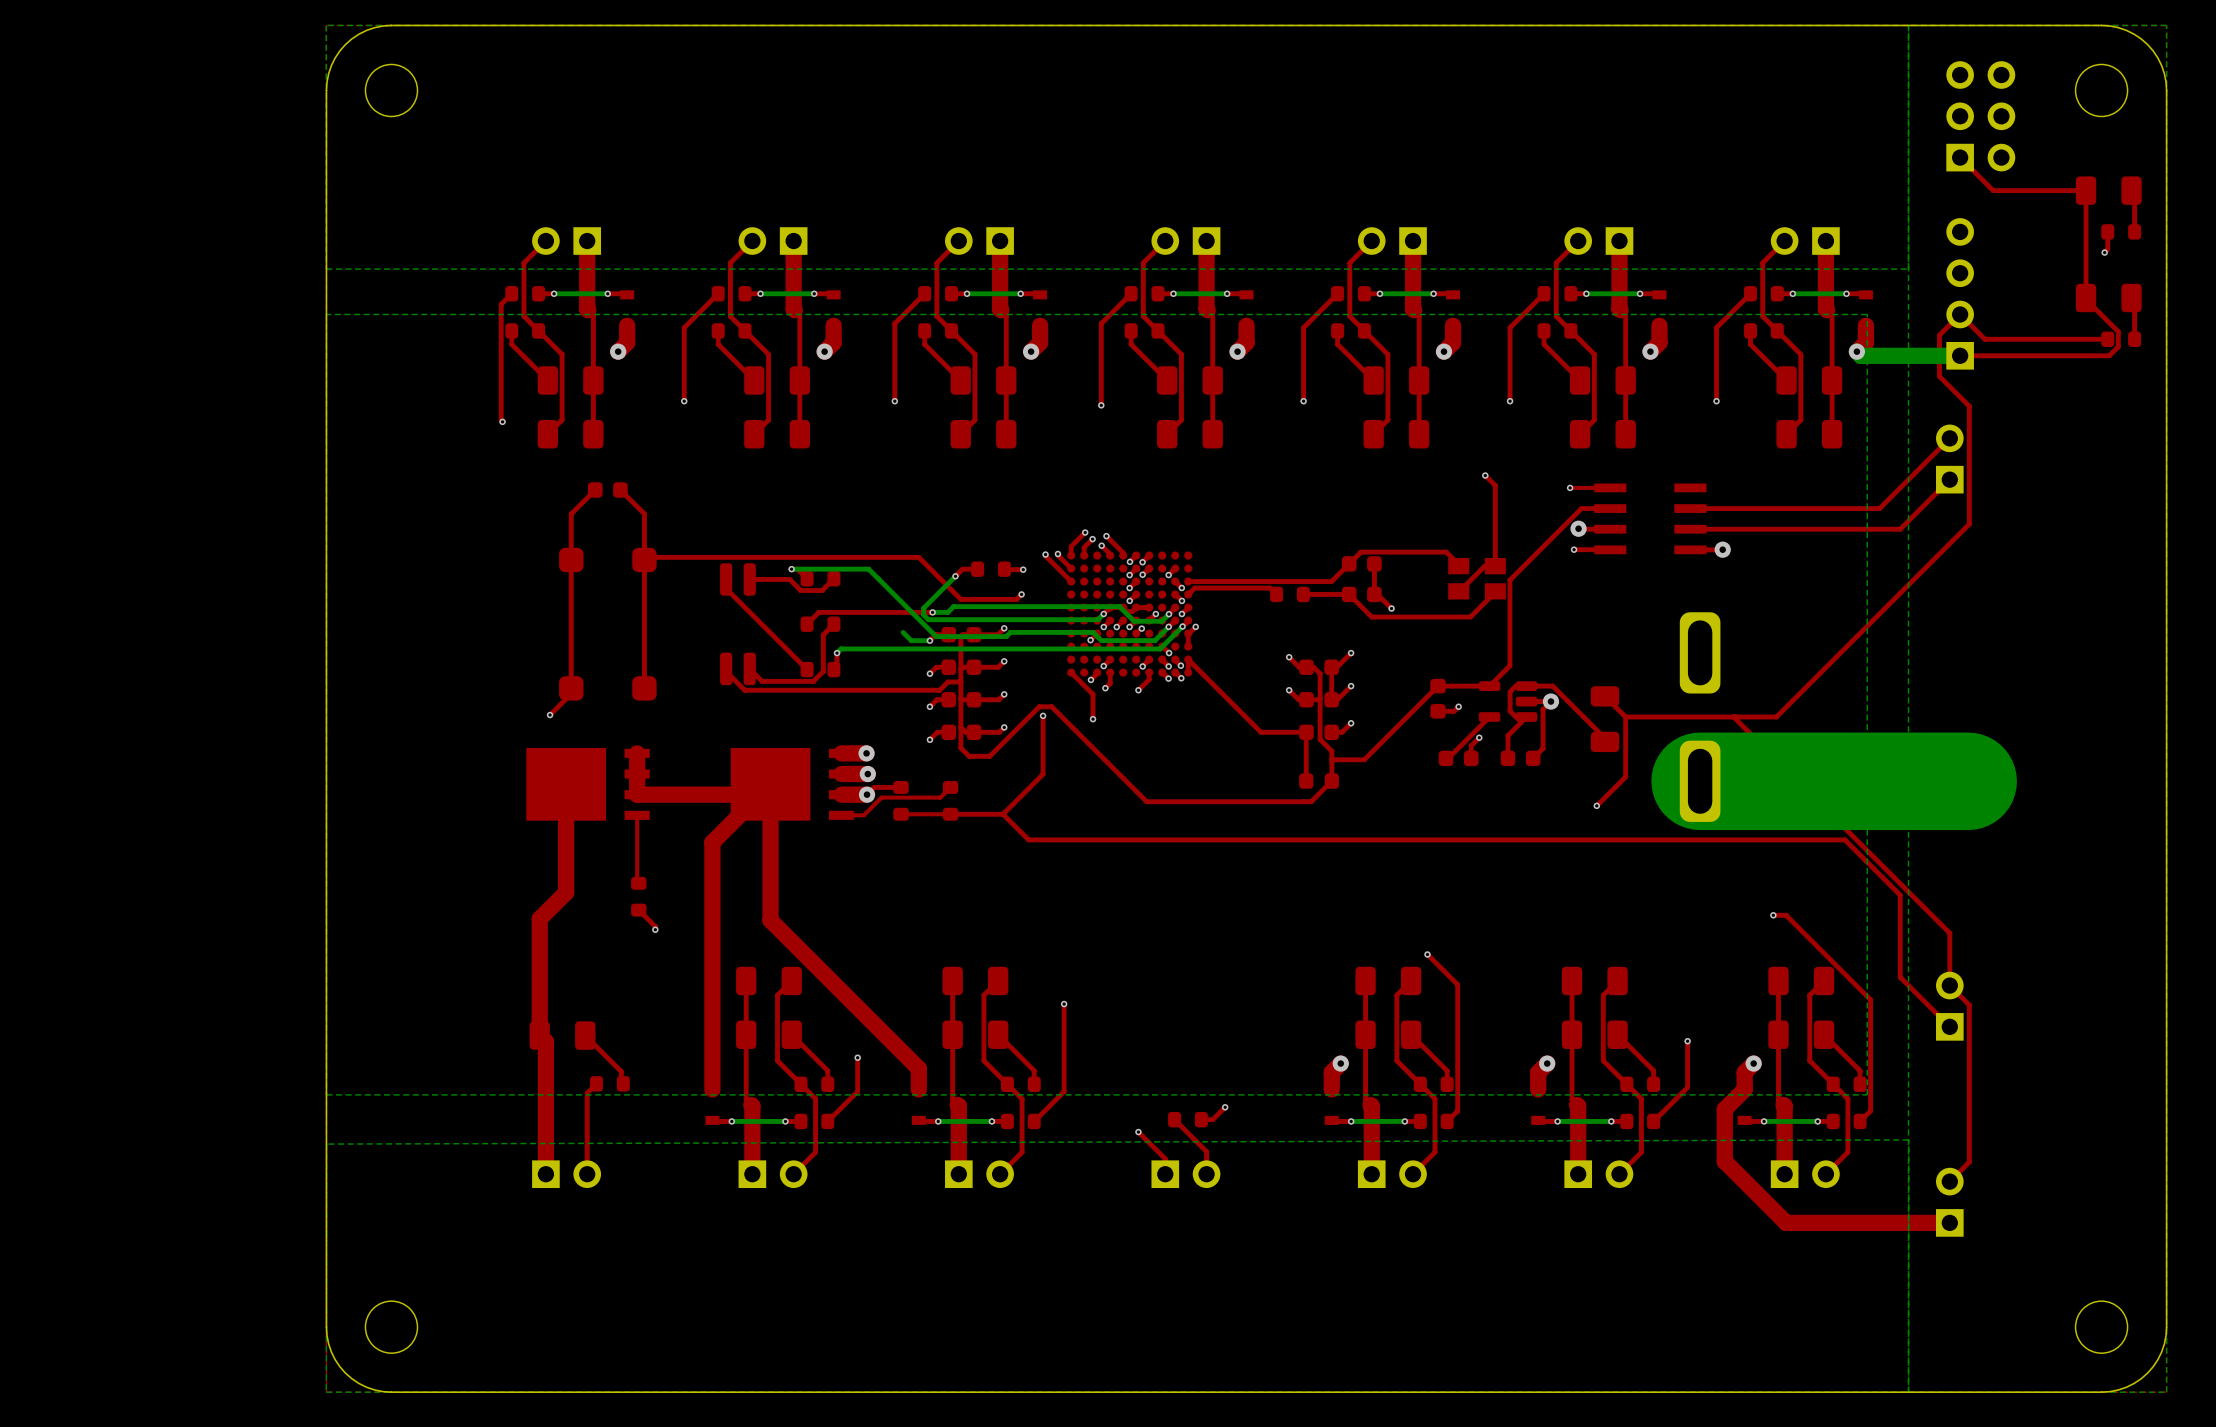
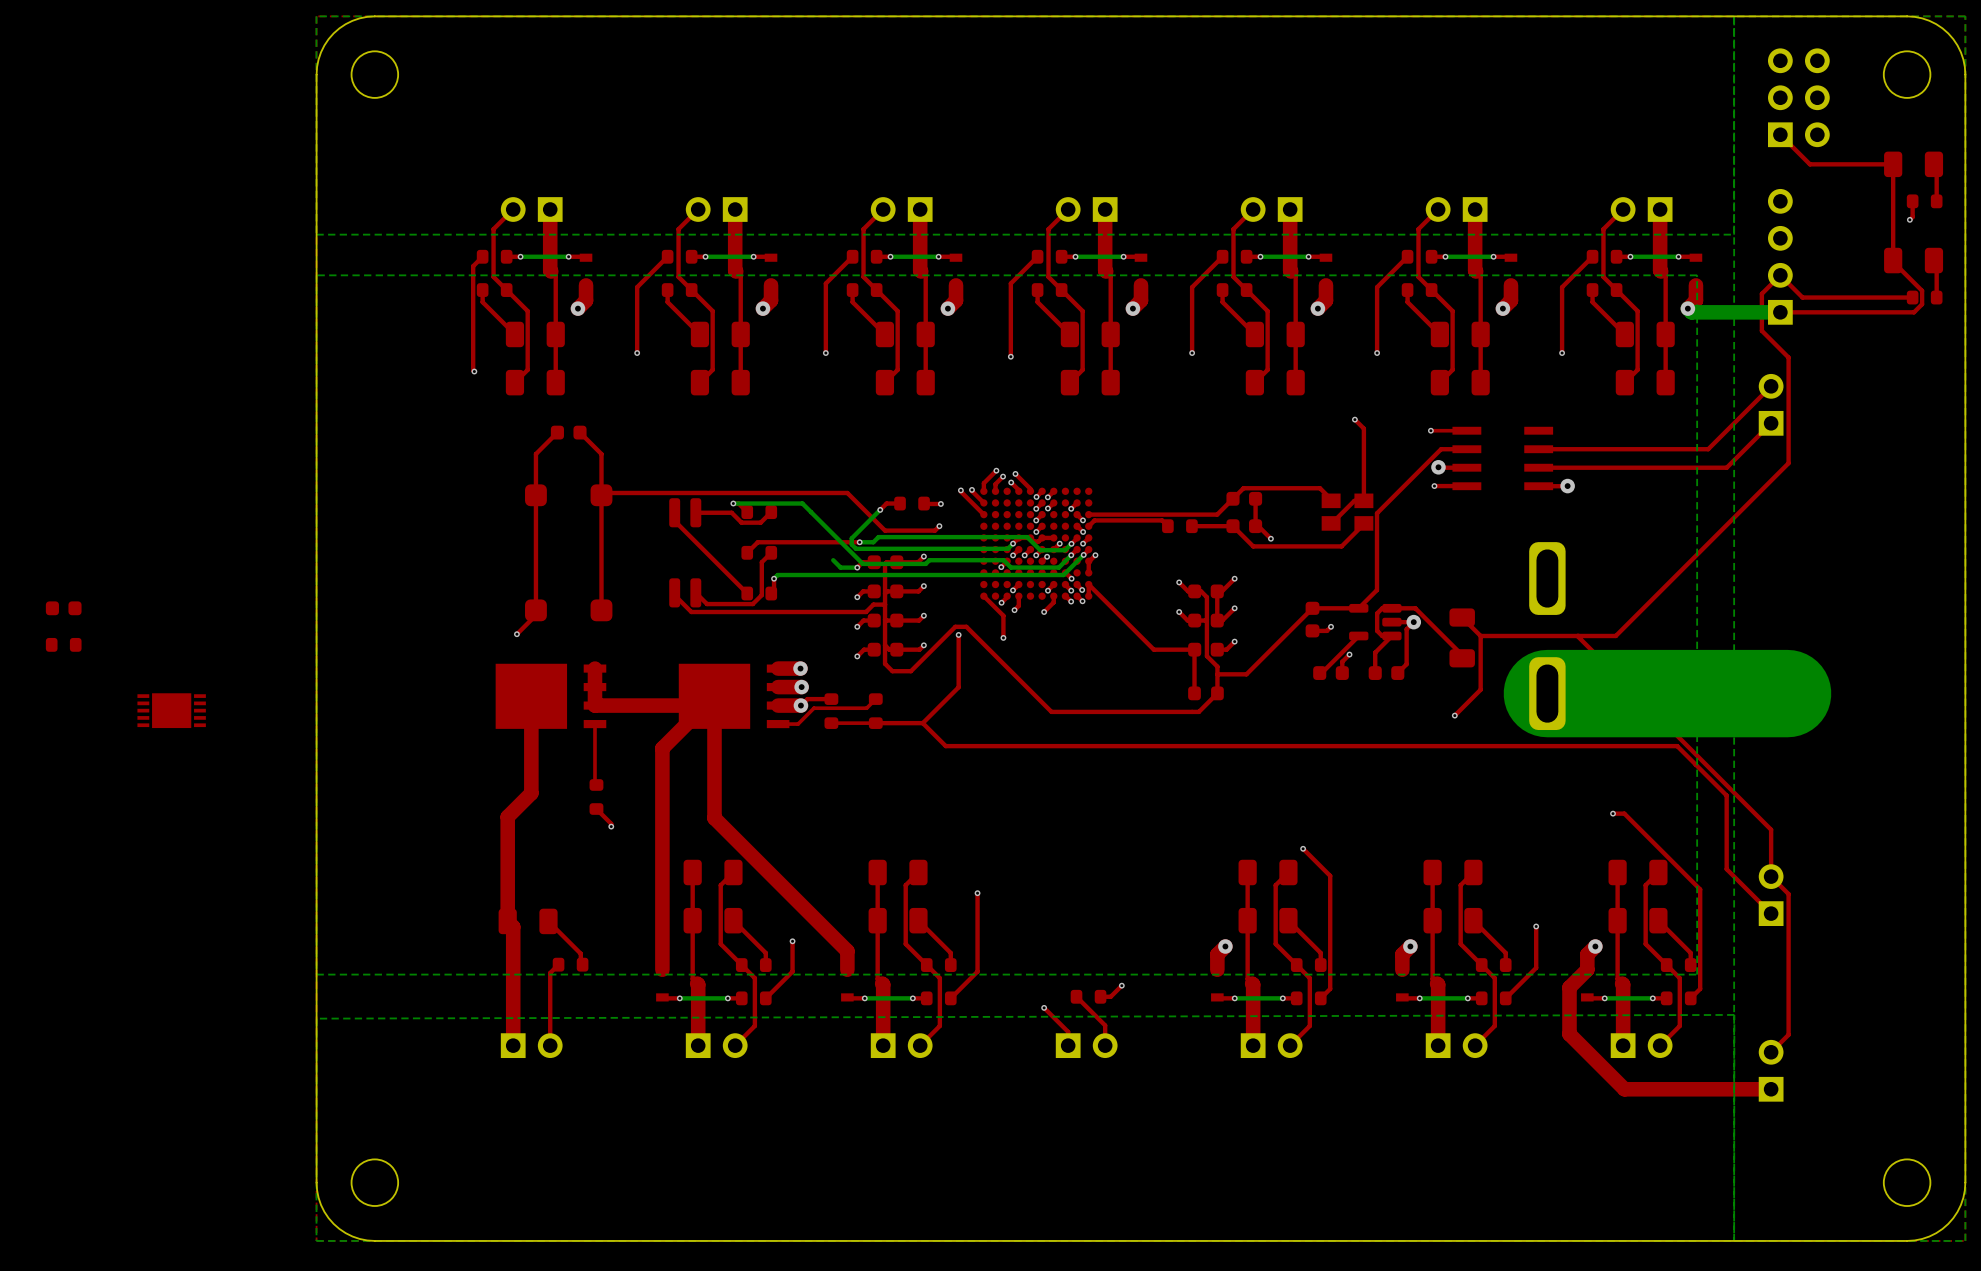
part: none -> (63, 608)
part: none -> (63, 644)
part: none -> (171, 710)

